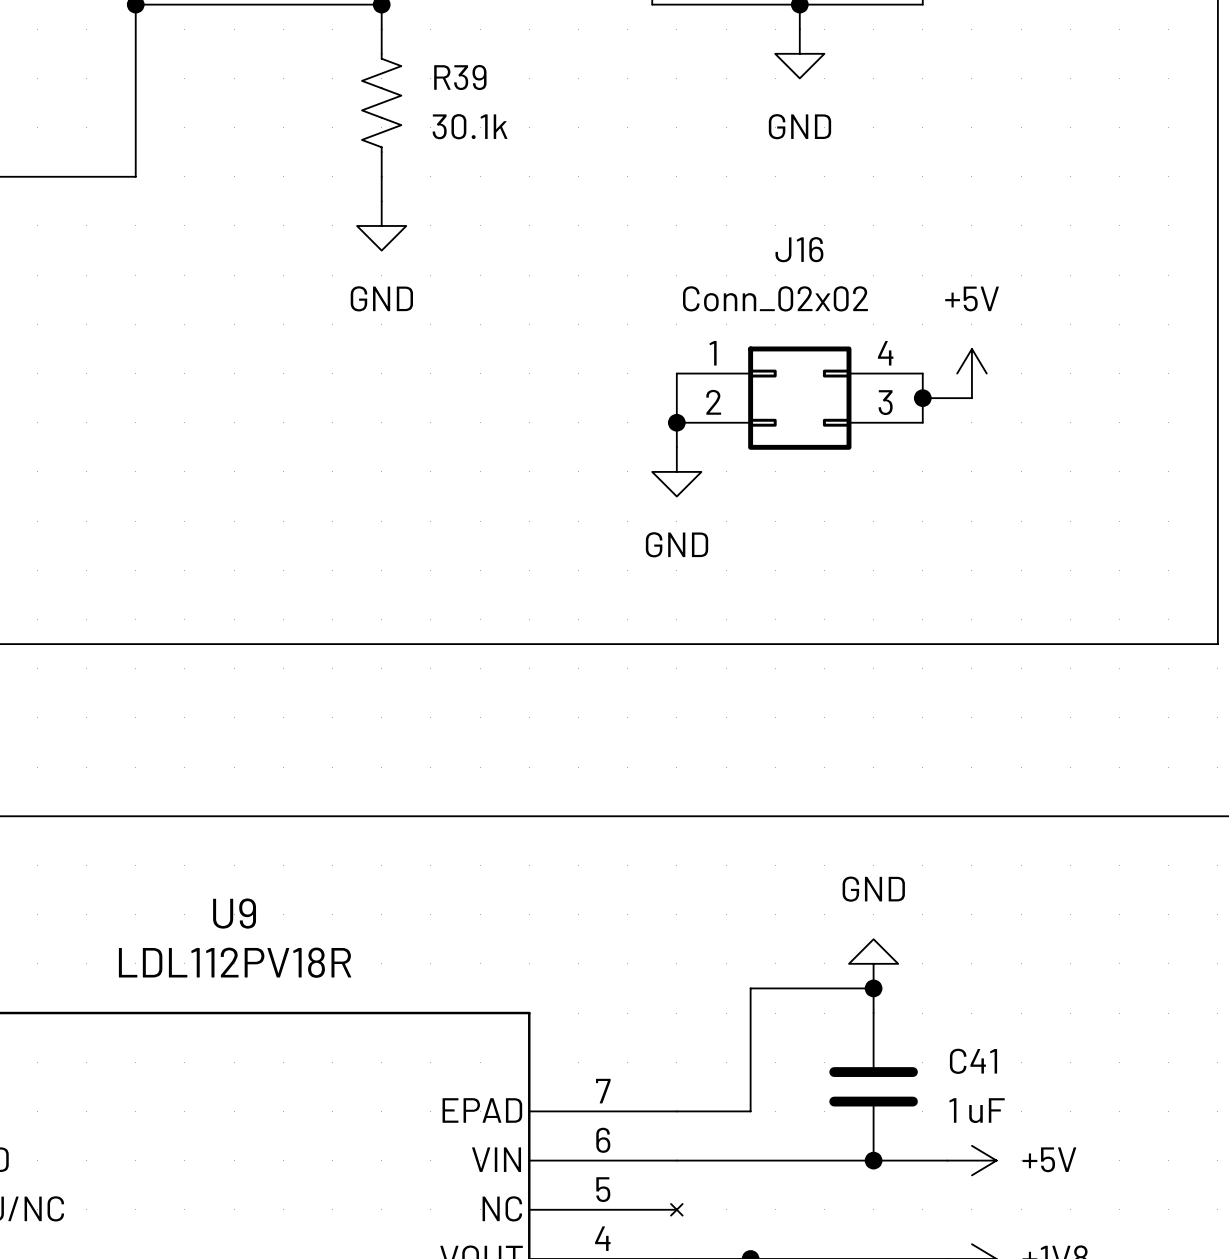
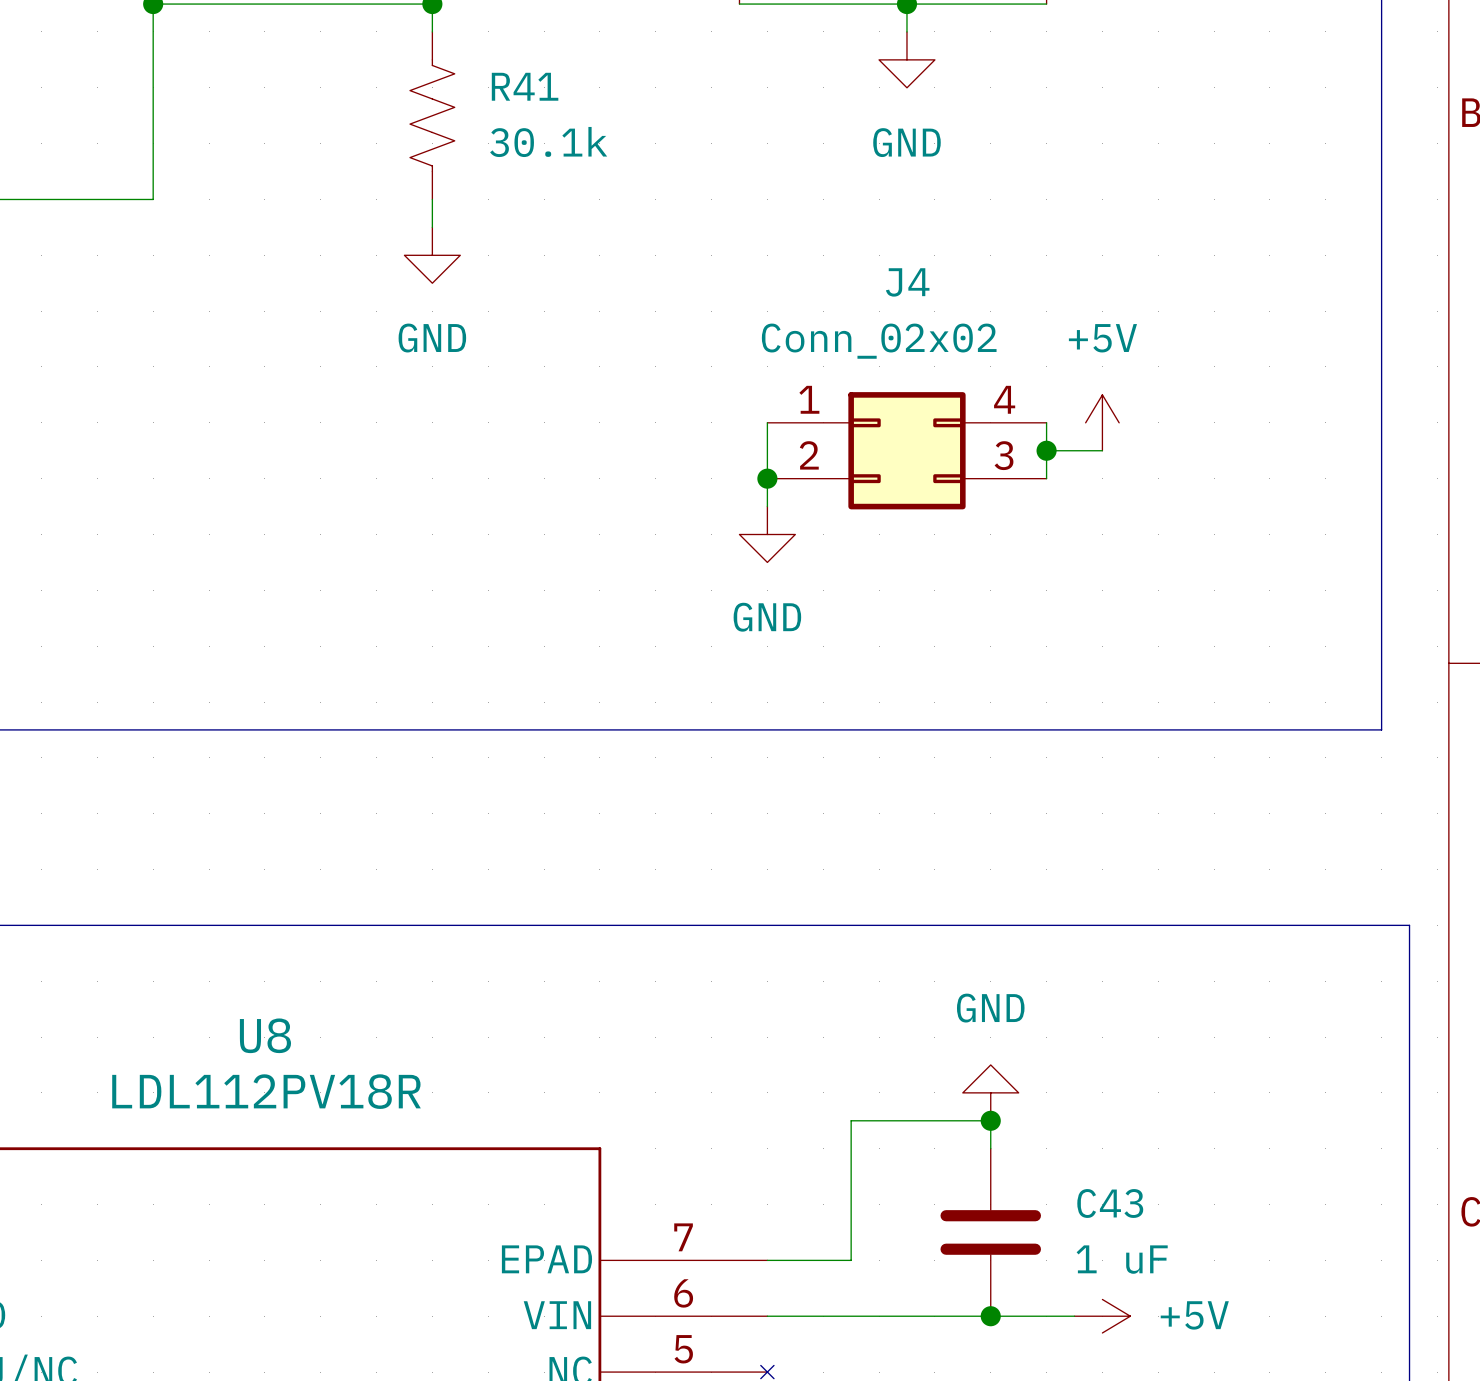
R39 name: R39 (460, 77) -> R41 (525, 86)
J16 name: J16 (799, 249) -> J4 (907, 282)
U9 name: U9 (234, 913) -> U8 (265, 1035)
C41 name: C41 (973, 1061) -> C43 (1110, 1203)

